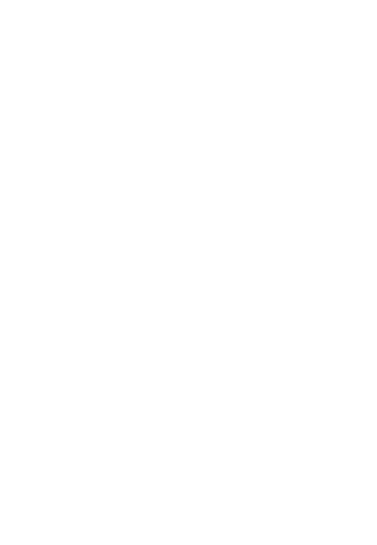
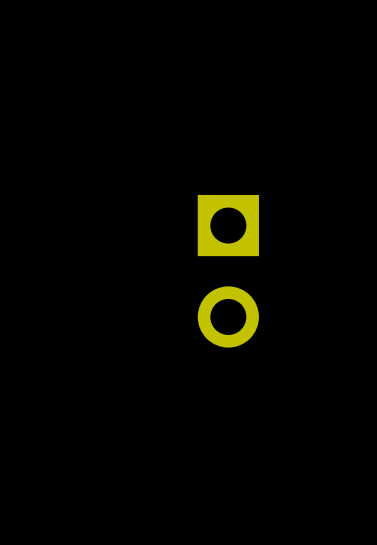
part: none -> (228, 271)

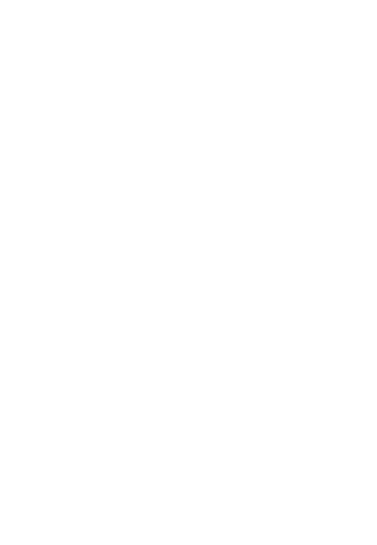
part: (228, 271) -> none

